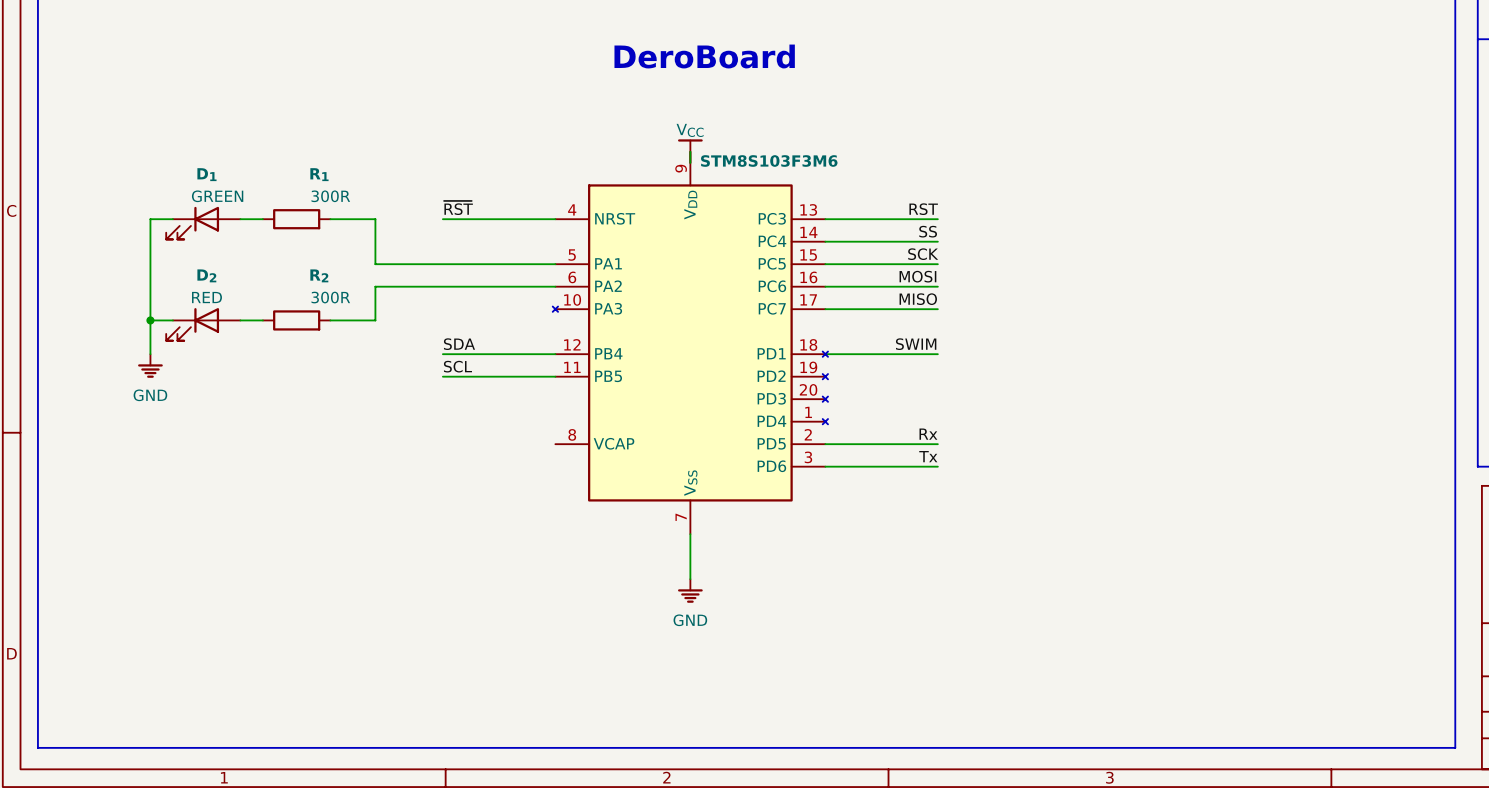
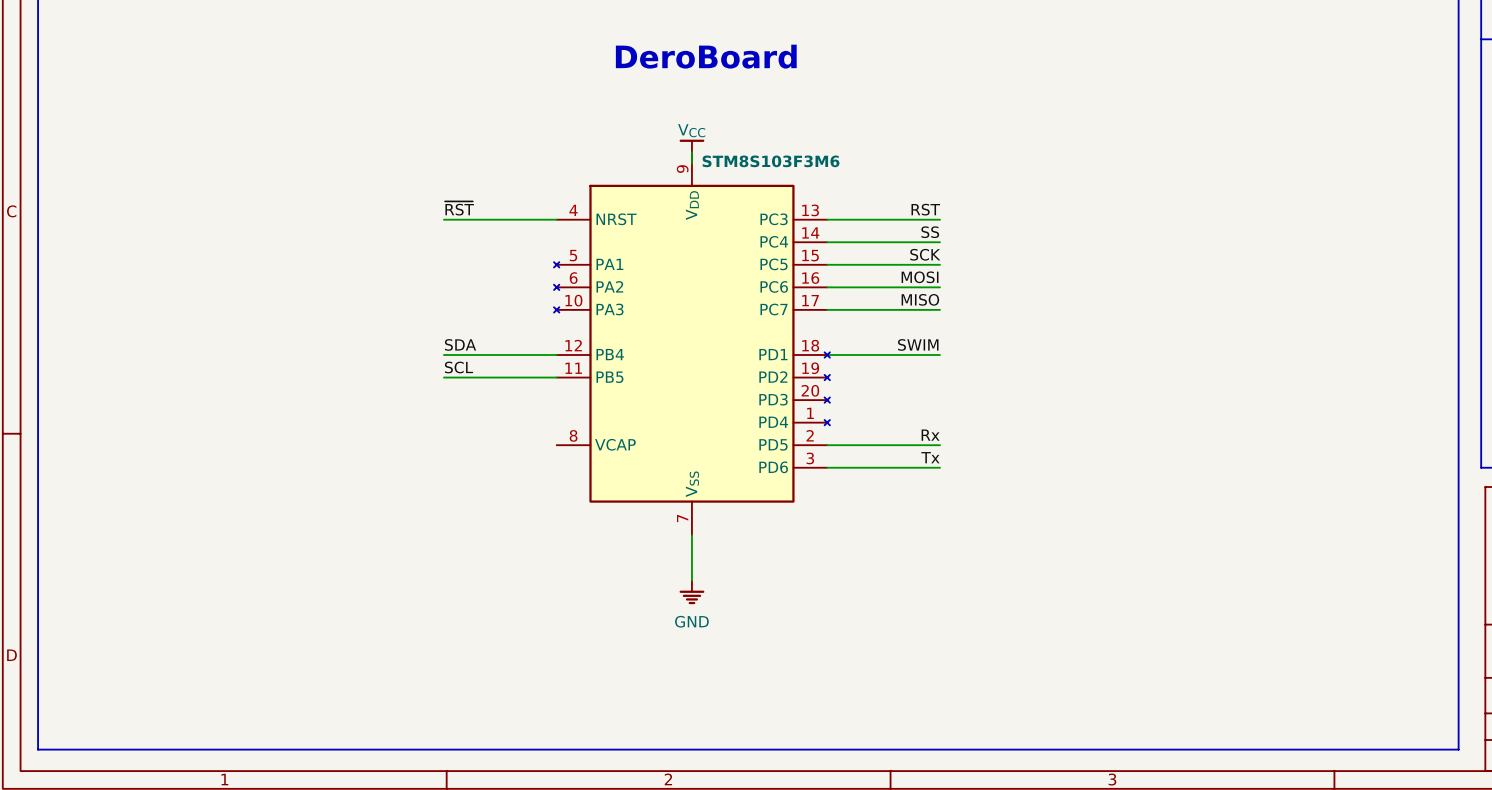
part symbol: [552, 151, 829, 535] -> [554, 152, 830, 536]
wire: (172, 219) (150, 219) (150, 354) -> none
wire: (240, 219) (262, 219) -> none
R1: 300R (296, 219) -> none
wire: (330, 219) (375, 219) (375, 264) (555, 264) -> none
D1: GREEN (203, 223) -> none
wire: (555, 286) (375, 286) (375, 320) (330, 320) -> none
wire: (150, 320) (172, 320) -> none
junction: (150, 320) -> none
wire: (240, 320) (262, 320) -> none
R2: 300R (296, 320) -> none
D2: RED (203, 324) -> none
power symbol: GND (150, 366) -> none

